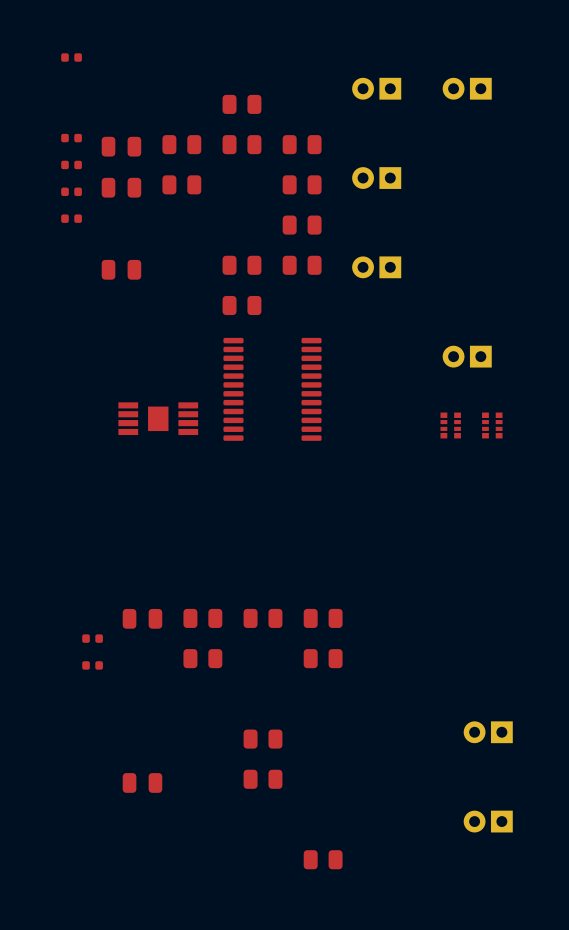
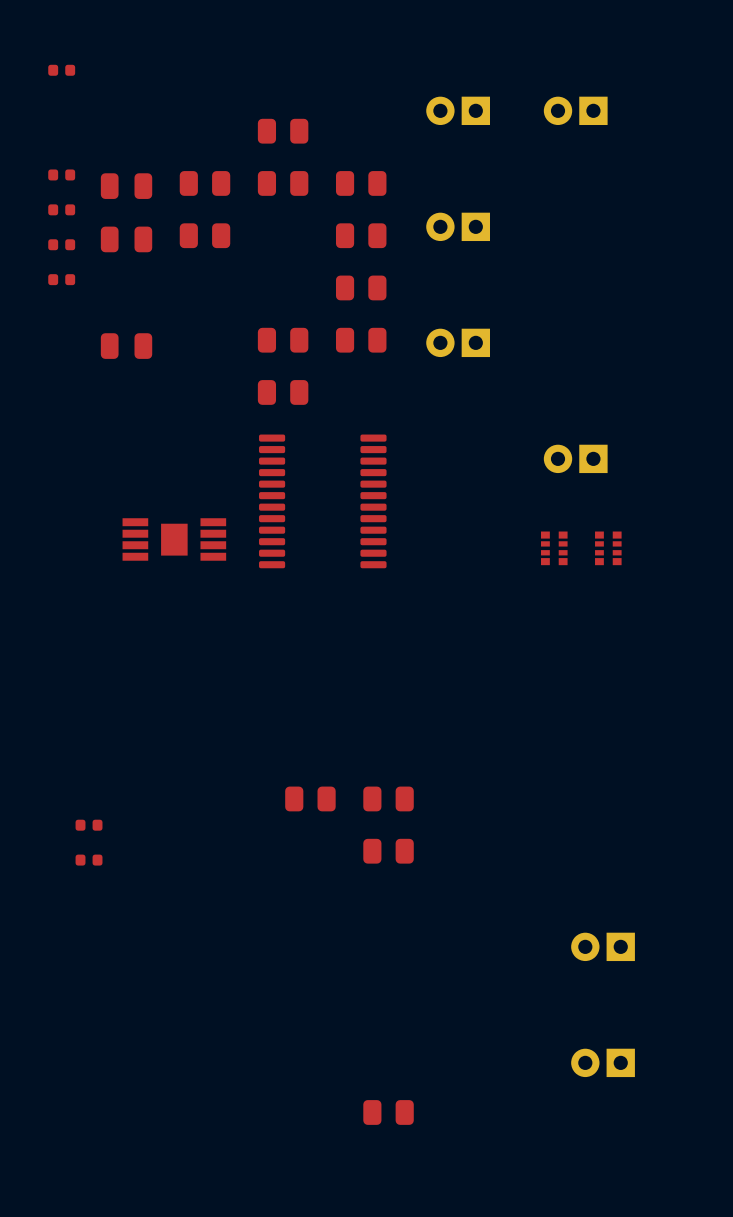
part: (142, 618) -> none
part: (202, 618) -> none
part: (202, 658) -> none
part: (263, 739) -> none
part: (263, 779) -> none
part: (142, 782) -> none

